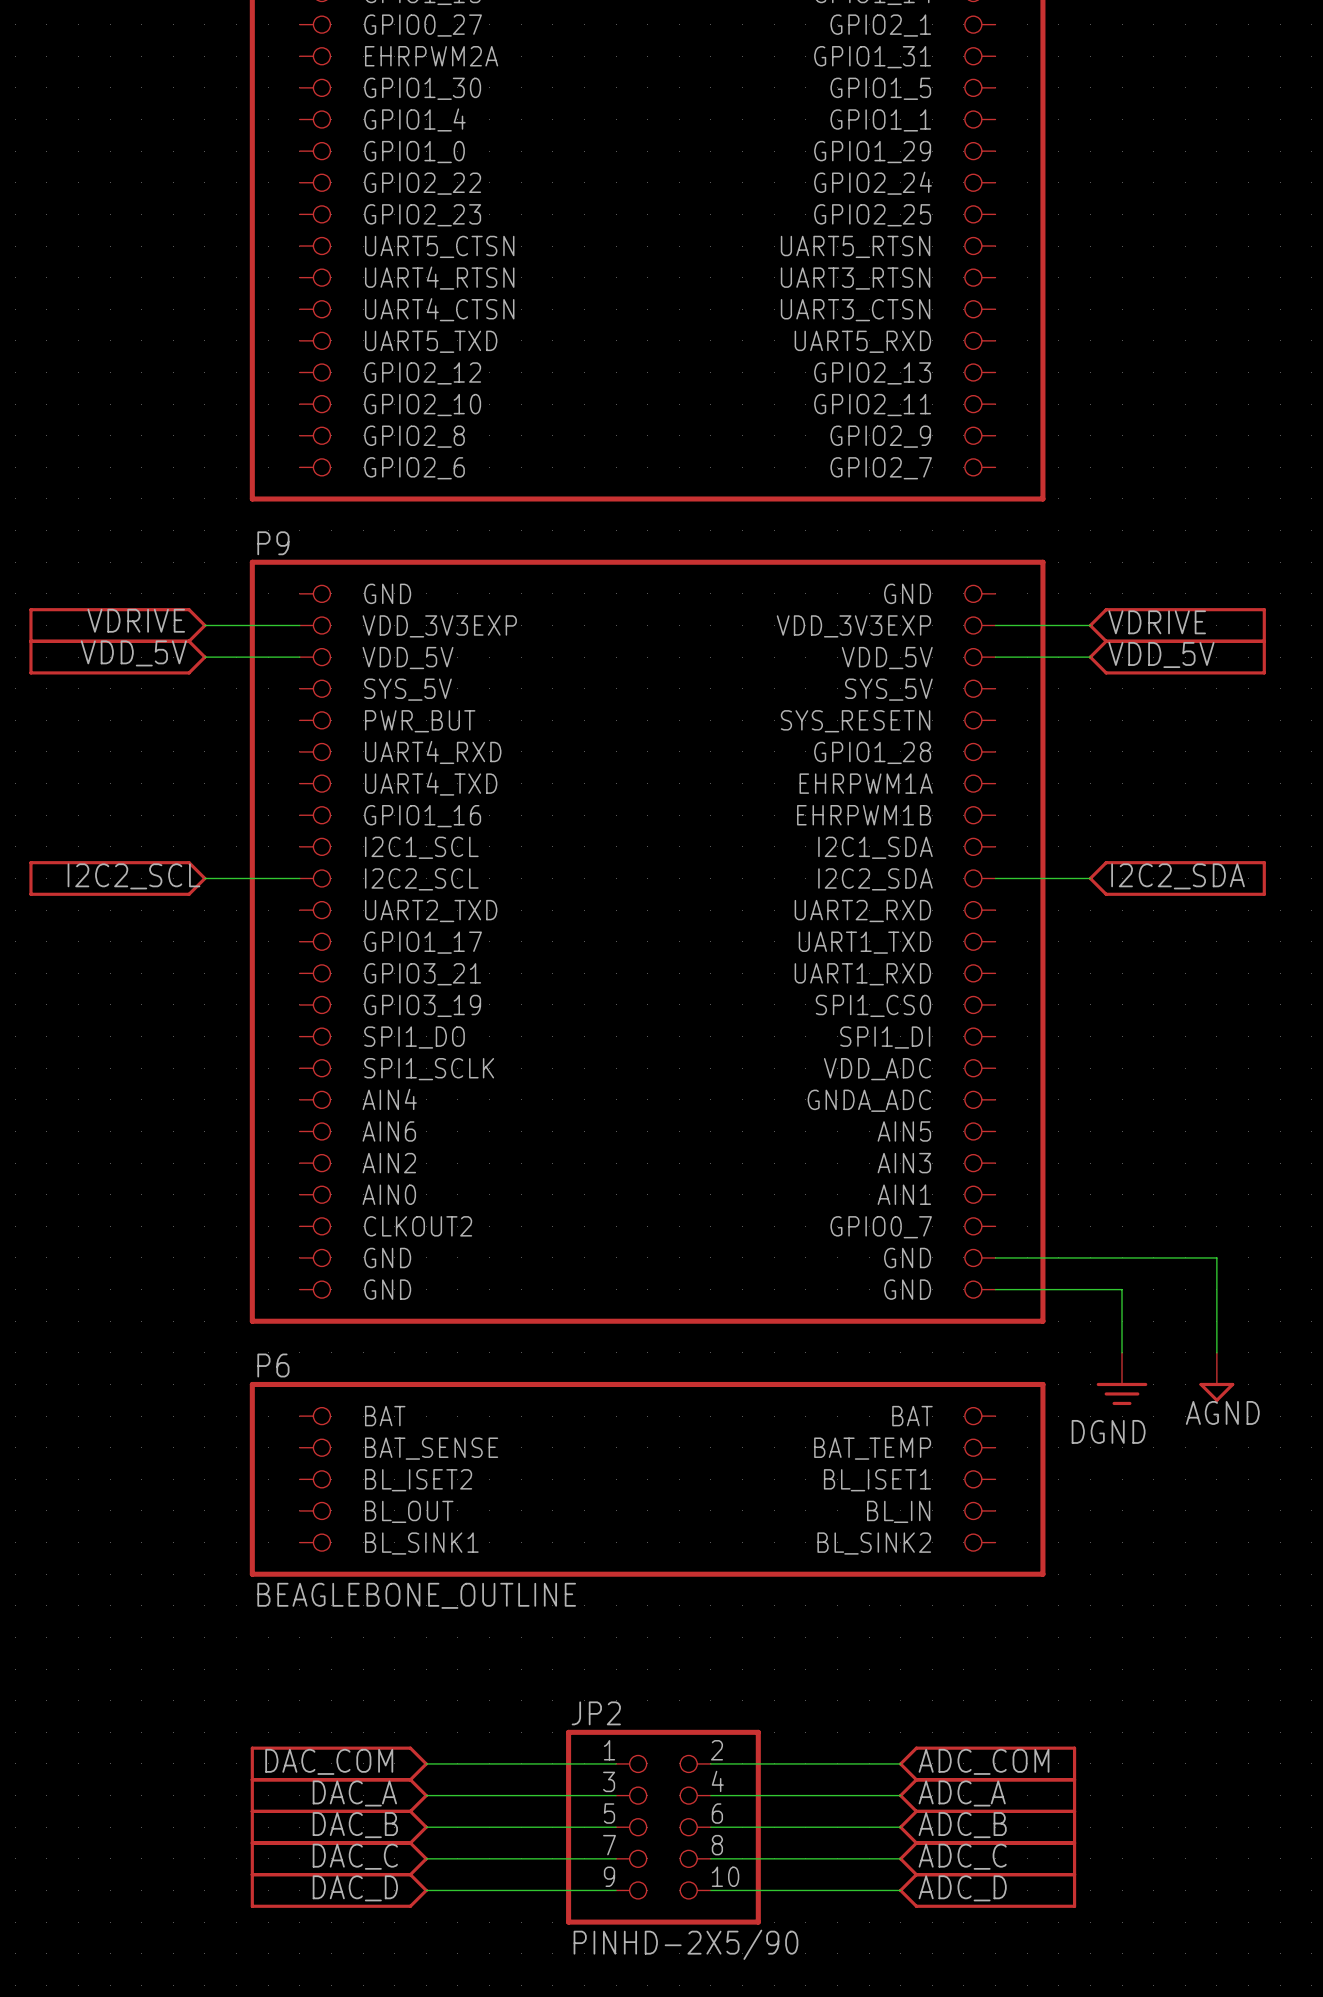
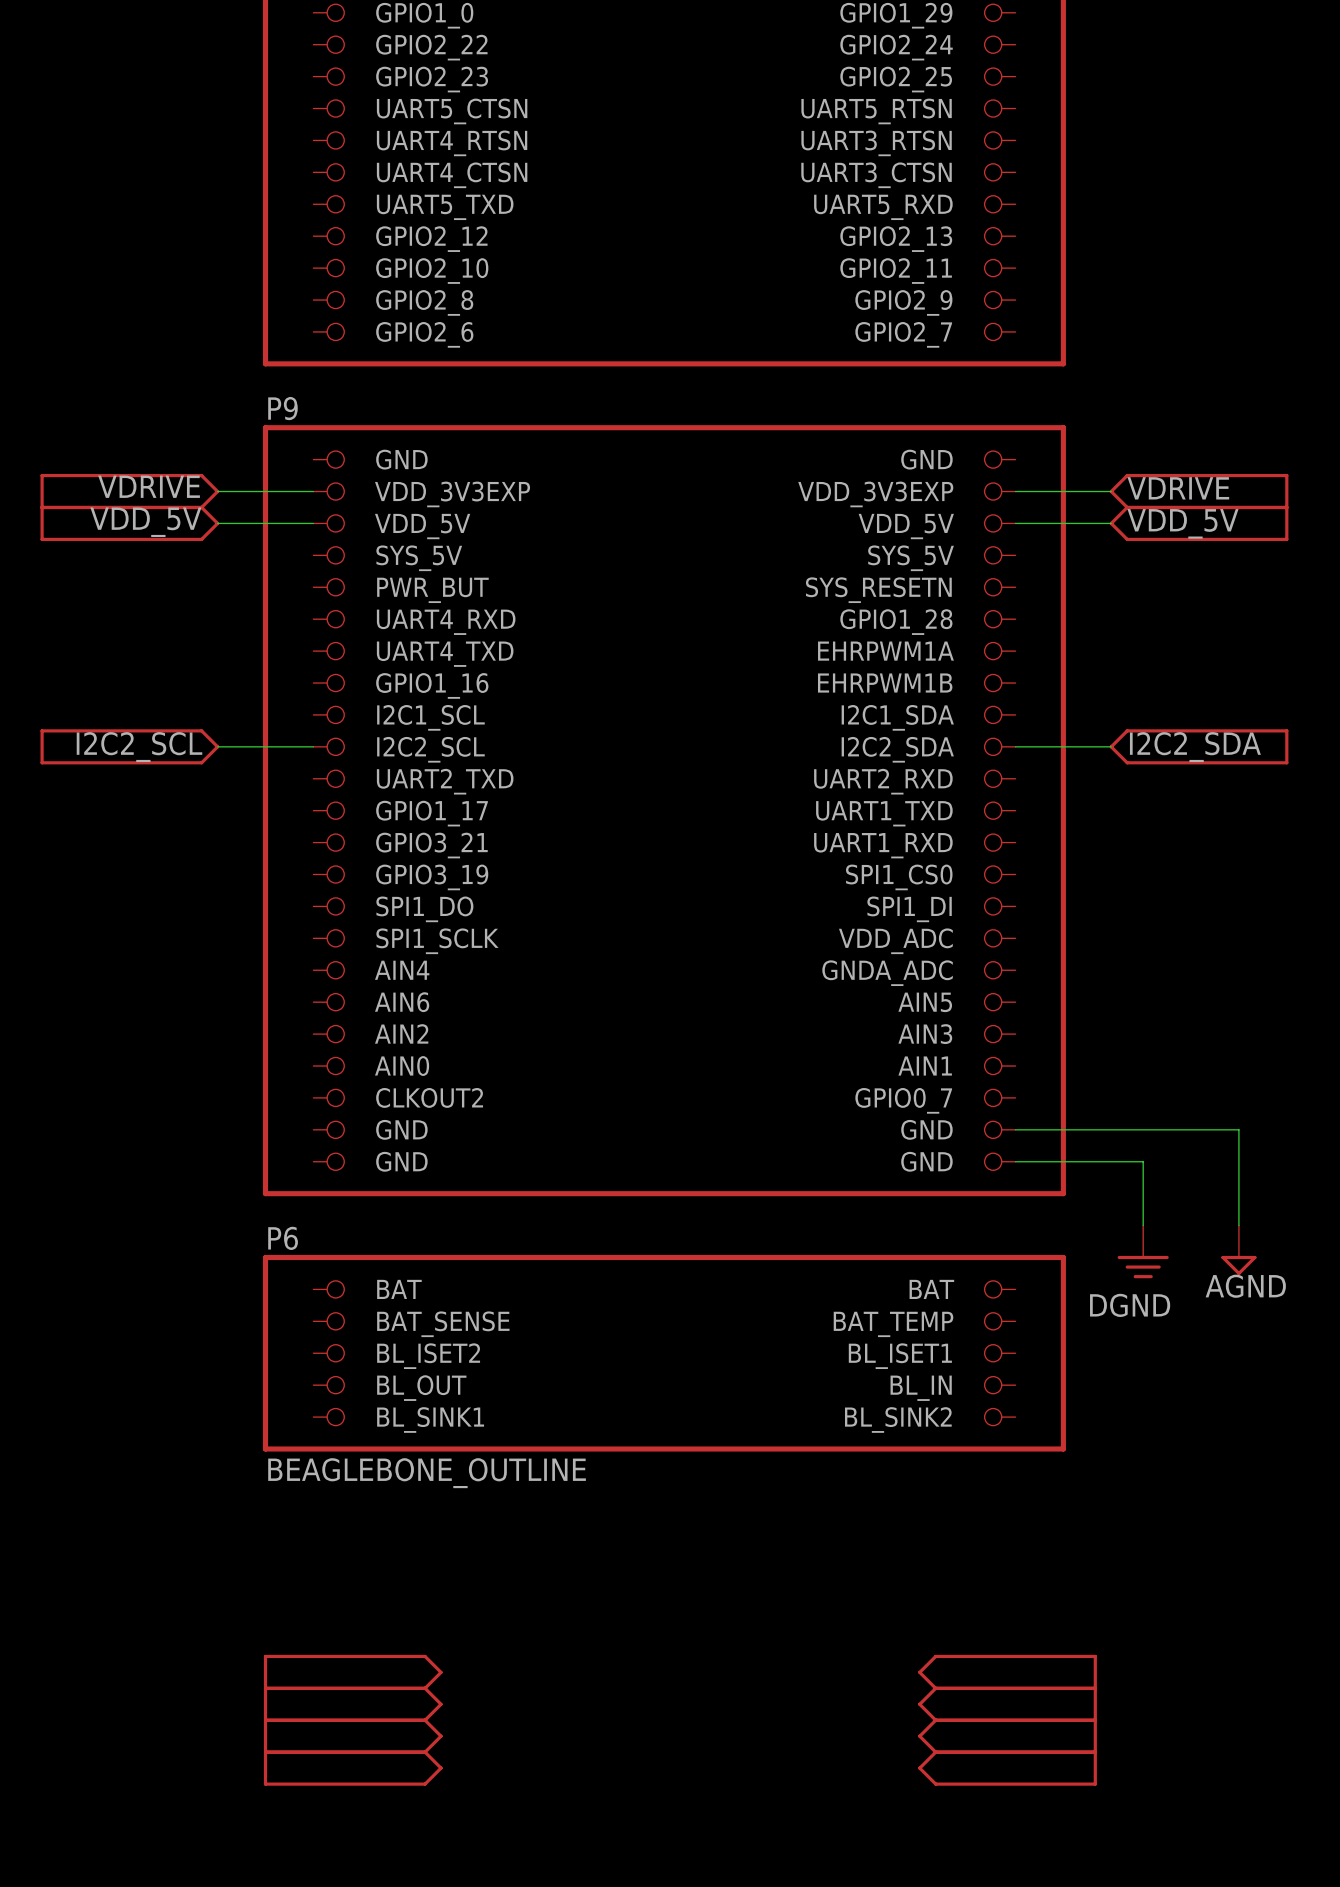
label: DAC_COM (329, 1761) -> none
label: ADC_COM (984, 1761) -> none
part: (339, 1763) -> none
wire: (426, 1763) (616, 1763) -> none
wire: (710, 1763) (900, 1763) -> none
part: (987, 1763) -> none
label: DAC_A (354, 1793) -> none
label: ADC_A (962, 1793) -> none
wire: (426, 1795) (616, 1795) -> none
wire: (710, 1795) (900, 1795) -> none
label: DAC_B (355, 1825) -> none
label: ADC_B (962, 1825) -> none
wire: (426, 1827) (616, 1827) -> none
JP2: PINHD-2X5/90 (663, 1827) -> none
wire: (710, 1827) (900, 1827) -> none
label: DAC_C (355, 1856) -> none
label: ADC_C (962, 1856) -> none
wire: (426, 1858) (616, 1858) -> none
wire: (710, 1858) (900, 1858) -> none
label: DAC_D (355, 1888) -> none
label: ADC_D (962, 1888) -> none
wire: (426, 1890) (616, 1890) -> none
wire: (710, 1890) (900, 1890) -> none

